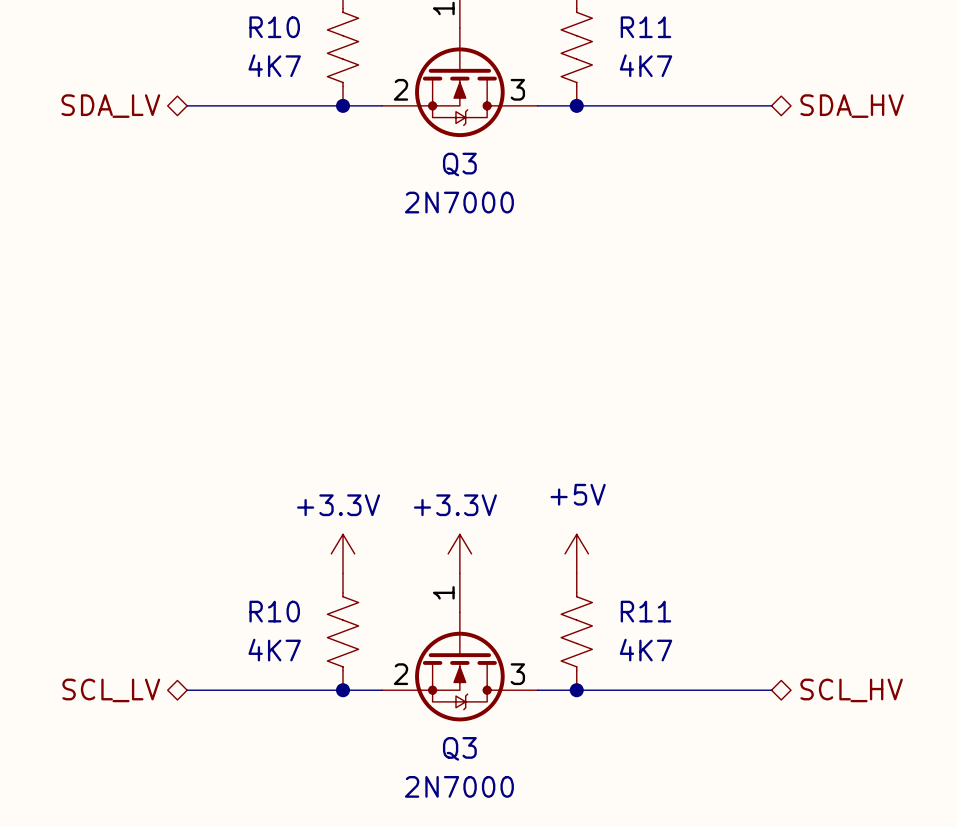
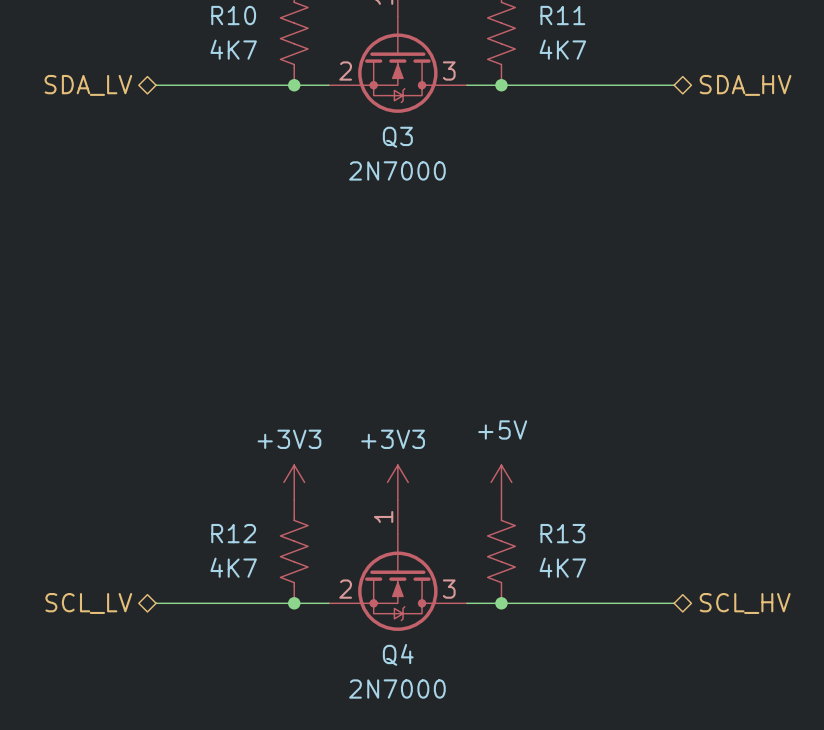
power symbol: +3.3V (343, 553) -> +3V3 (294, 482)
power symbol: +3.3V (459, 553) -> +3V3 (397, 482)
R10 name: R10 (274, 611) -> R12 (233, 533)
R11 name: R11 (645, 611) -> R13 (562, 533)
Q3 name: Q3 (459, 748) -> Q4 (398, 654)

